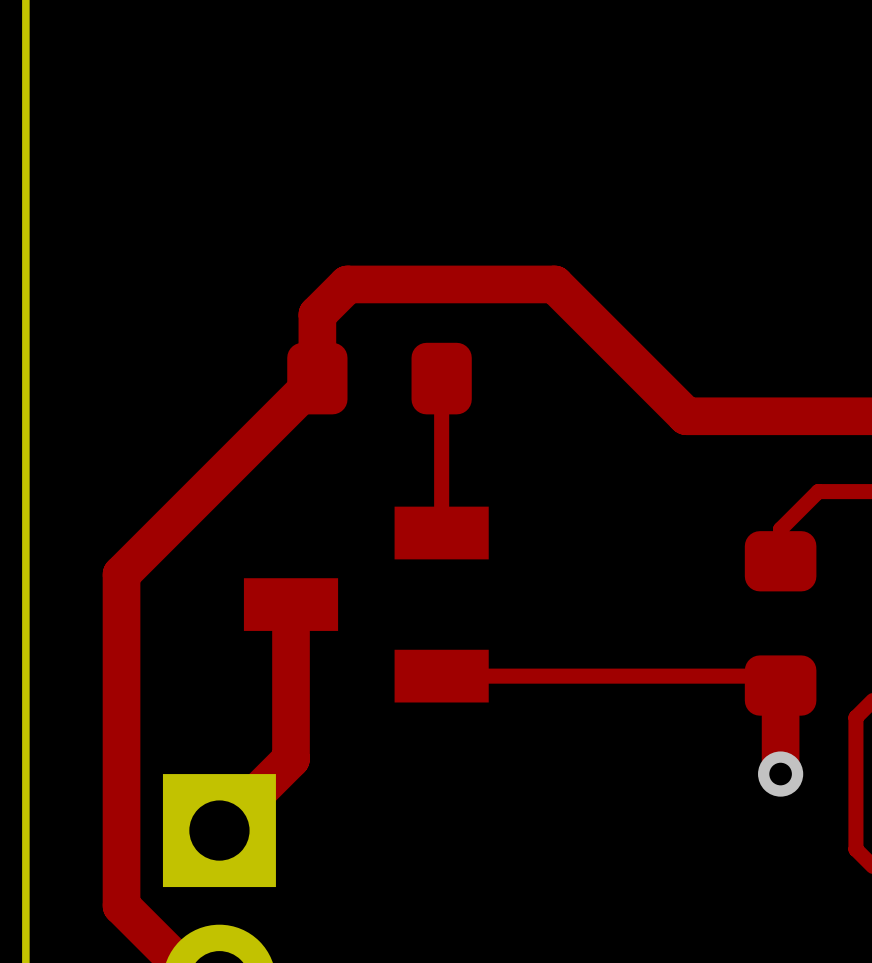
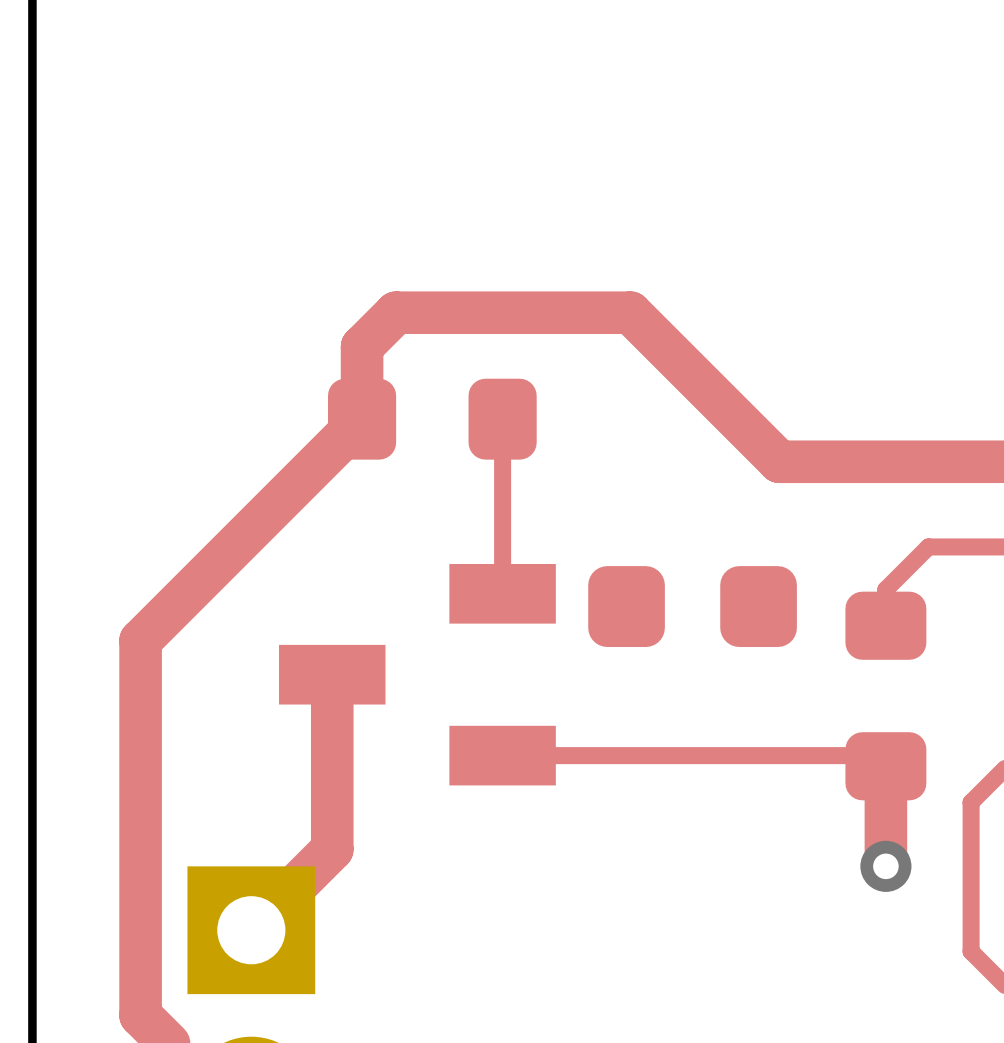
part: none -> (692, 606)

